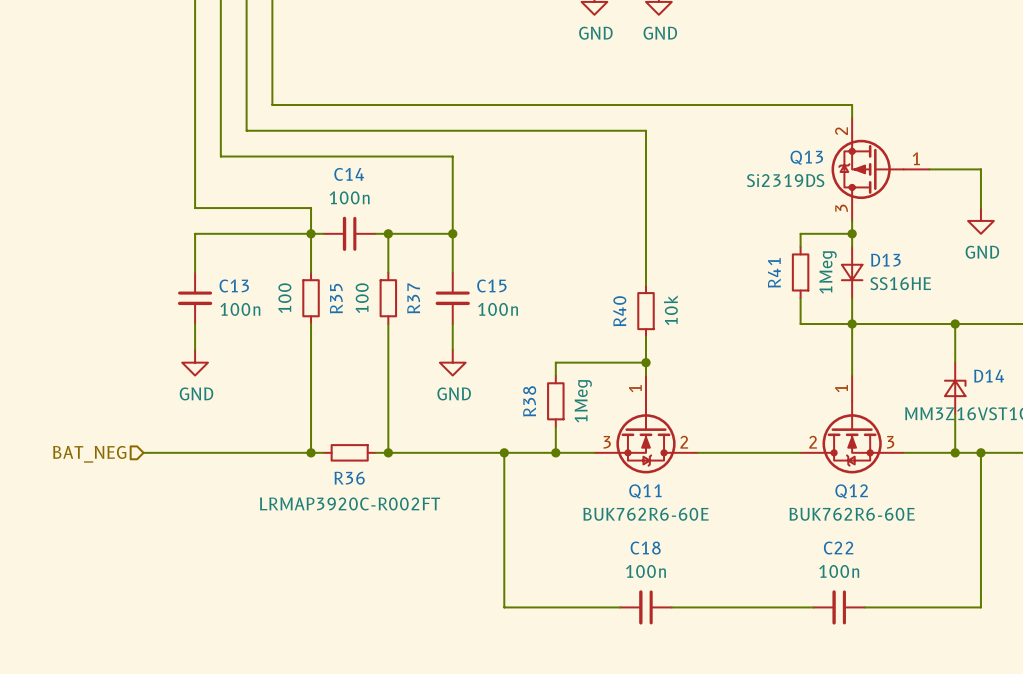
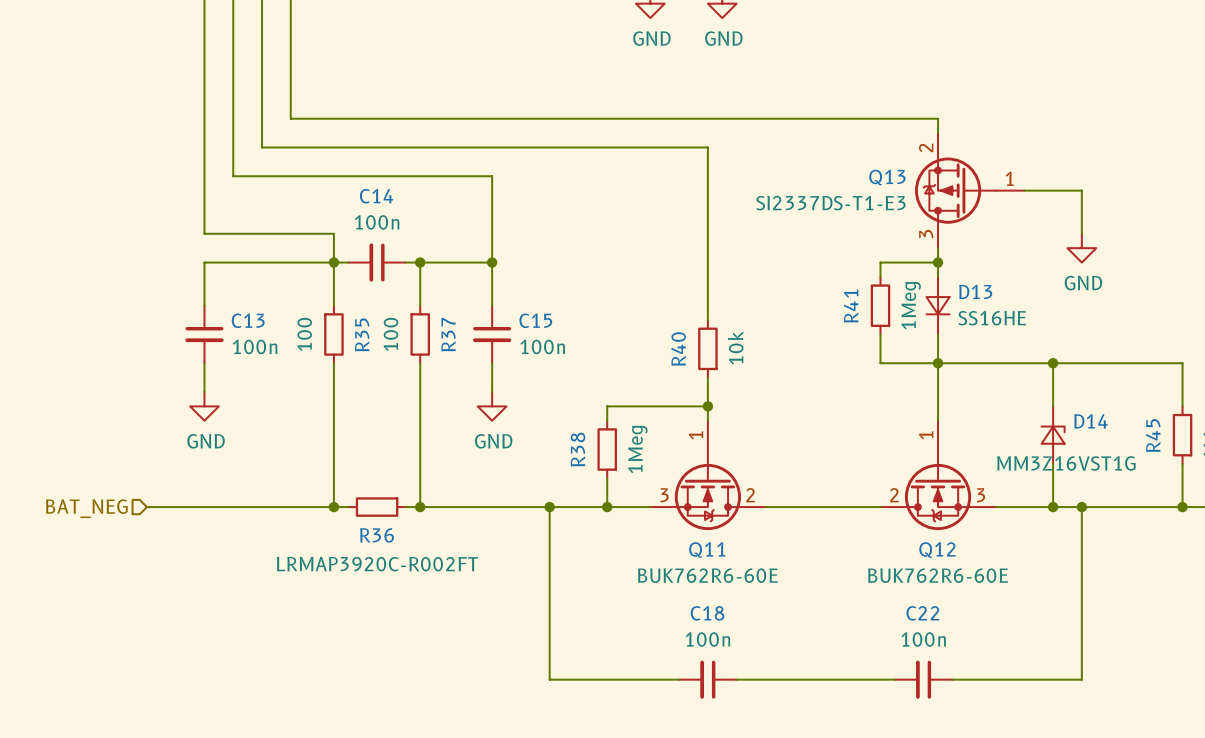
Q13 value: Si2319DS (785, 180) -> SI2337DS-T1-E3 (830, 203)

